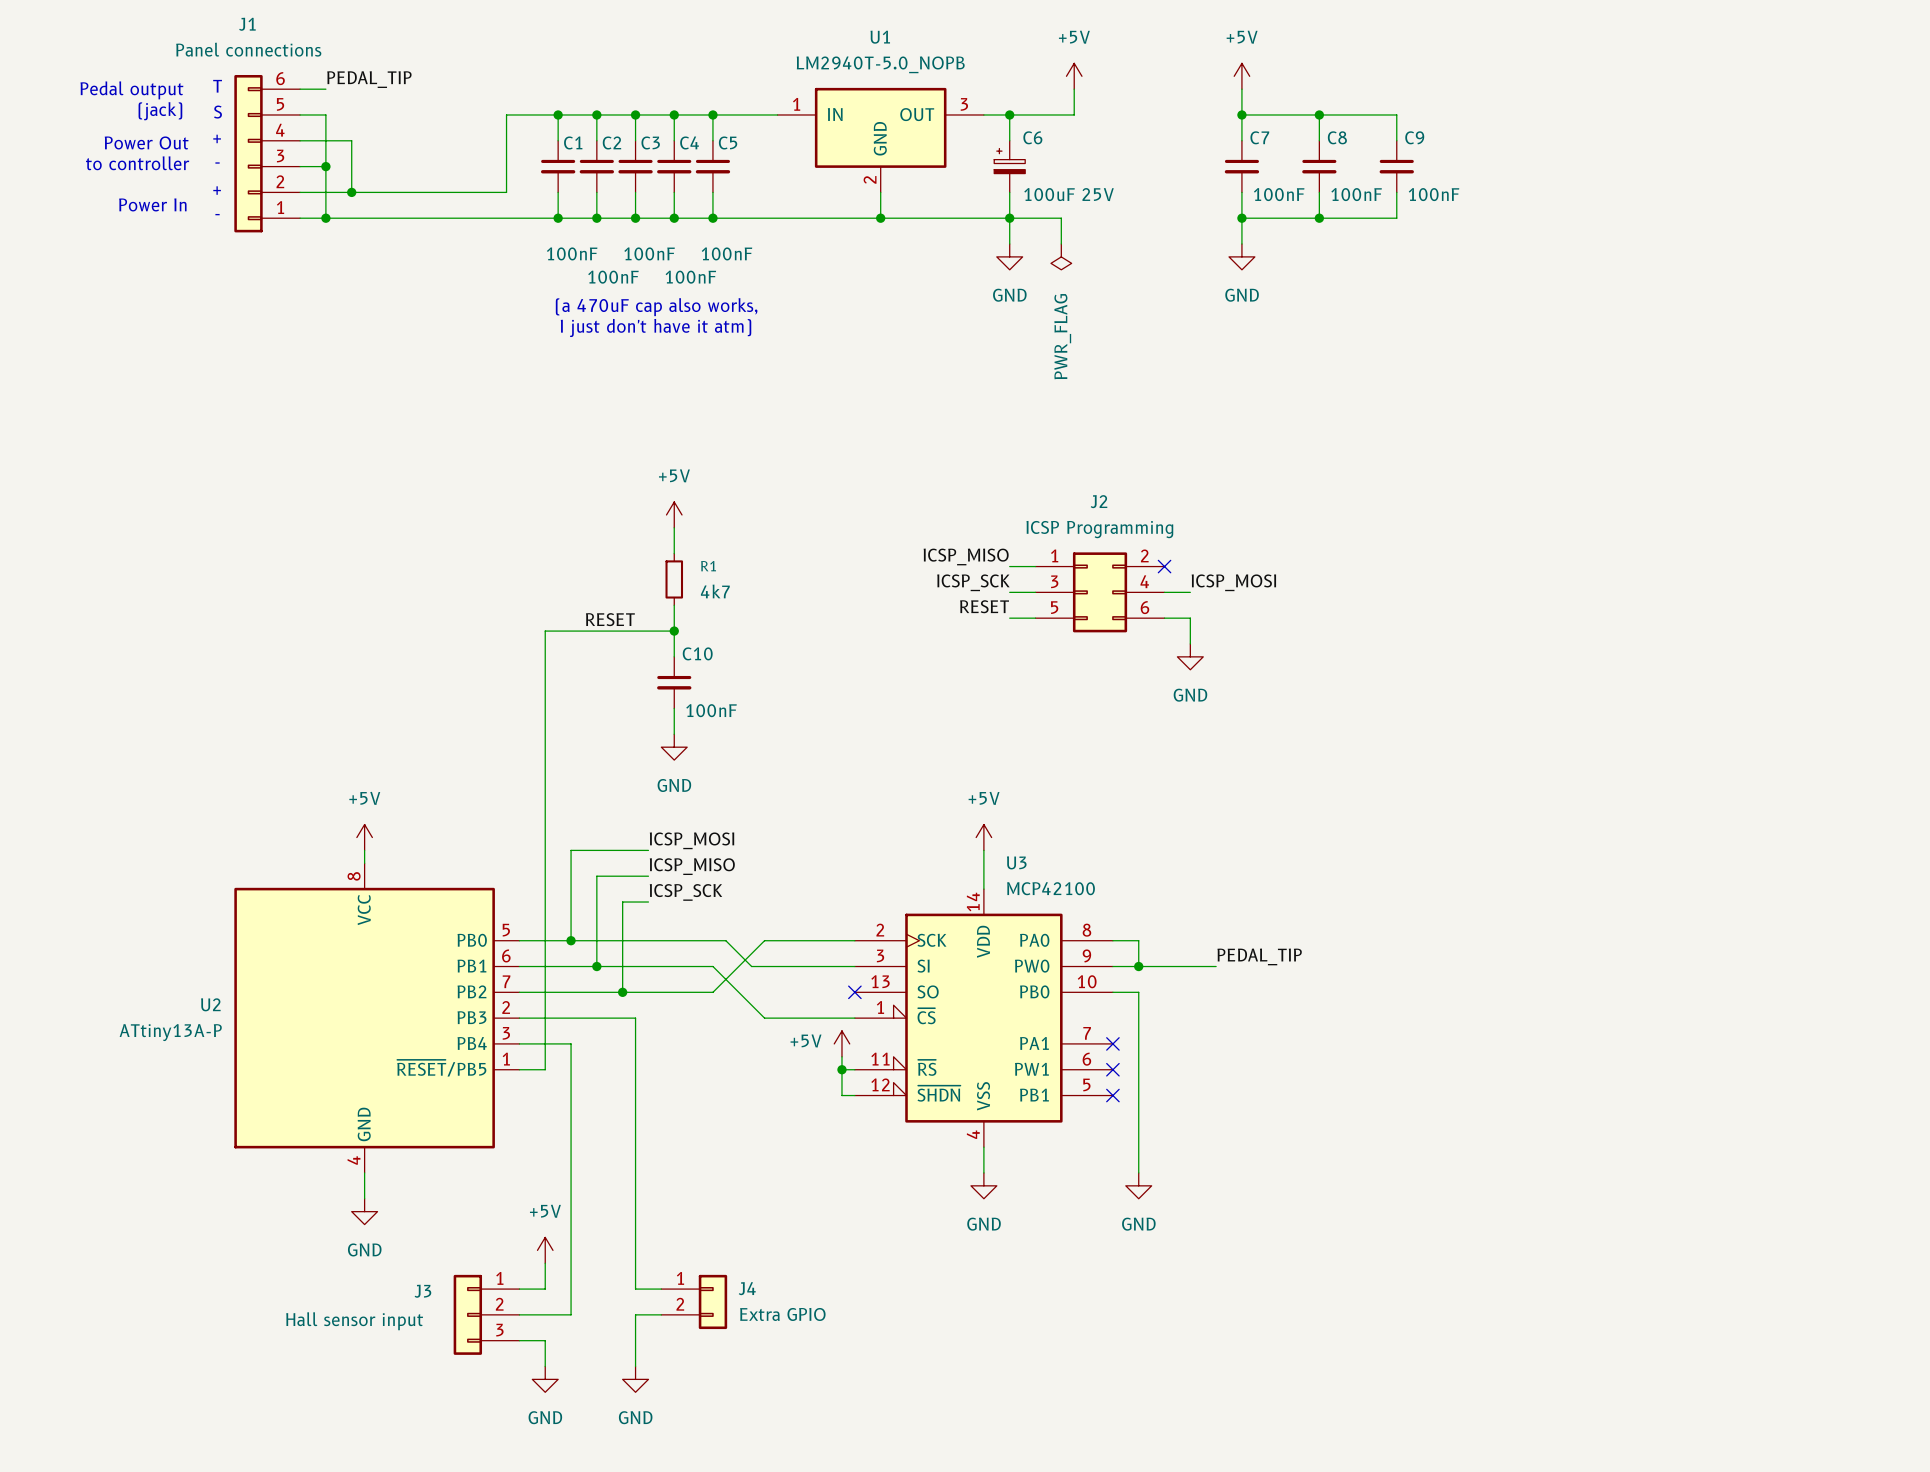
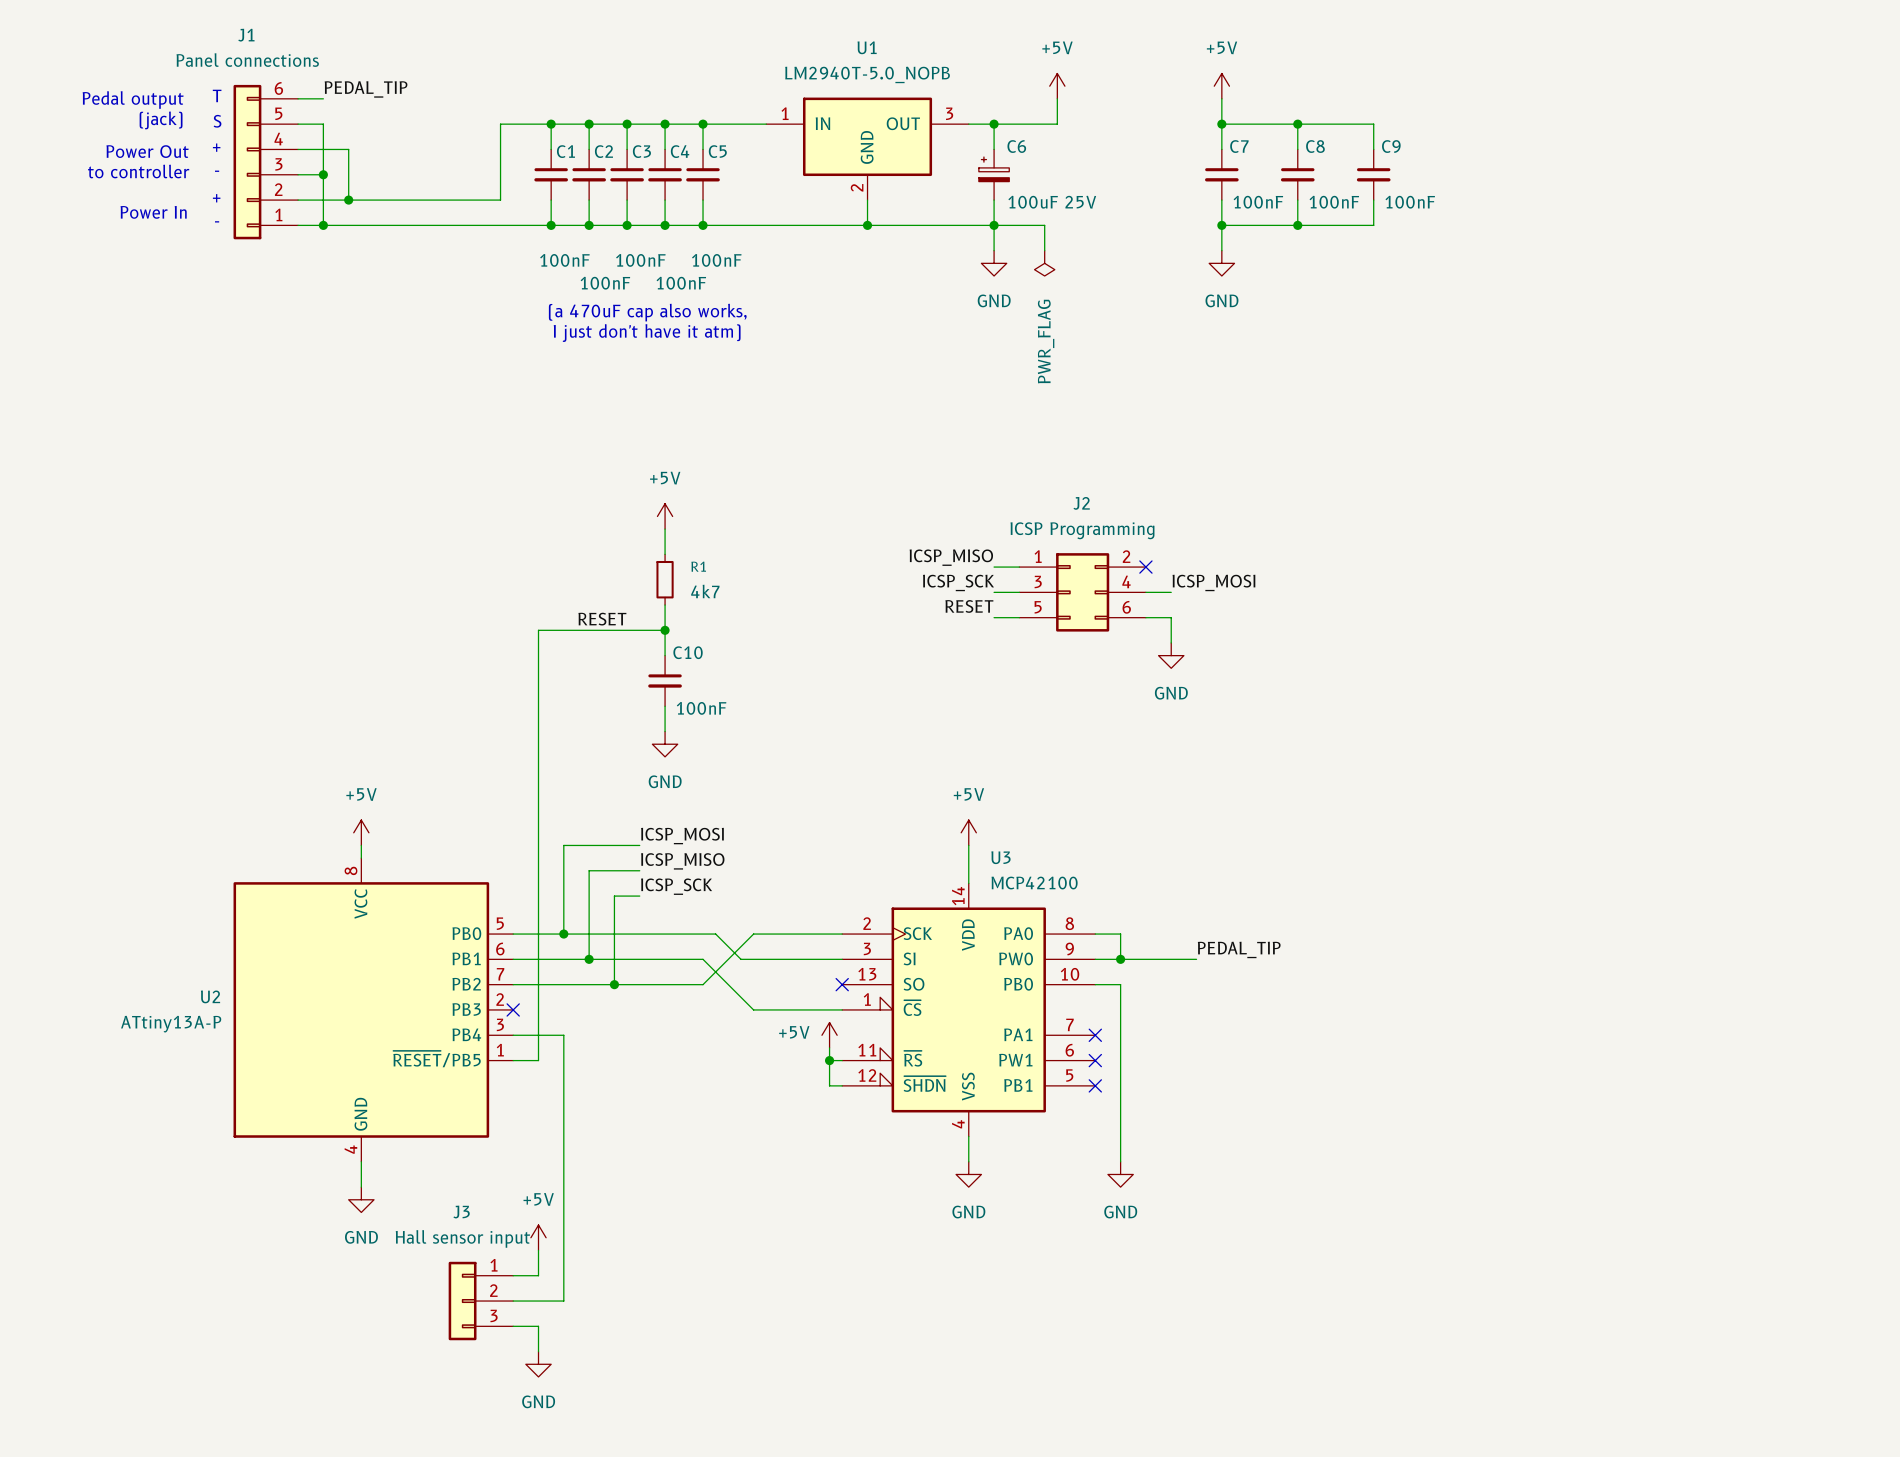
wire: (519, 1018) (635, 1018) (635, 1289) (661, 1289) -> none
no-connect mark: none -> (513, 1009)
J3 name position: J3 (422, 1291) -> J3 (461, 1212)
J4: Extra GPIO (694, 1301) -> none
wire: (661, 1314) (635, 1314) (635, 1366) -> none
J3 value position: Hall sensor input (354, 1321) -> Hall sensor input (462, 1238)
power symbol: GND (635, 1379) -> none

